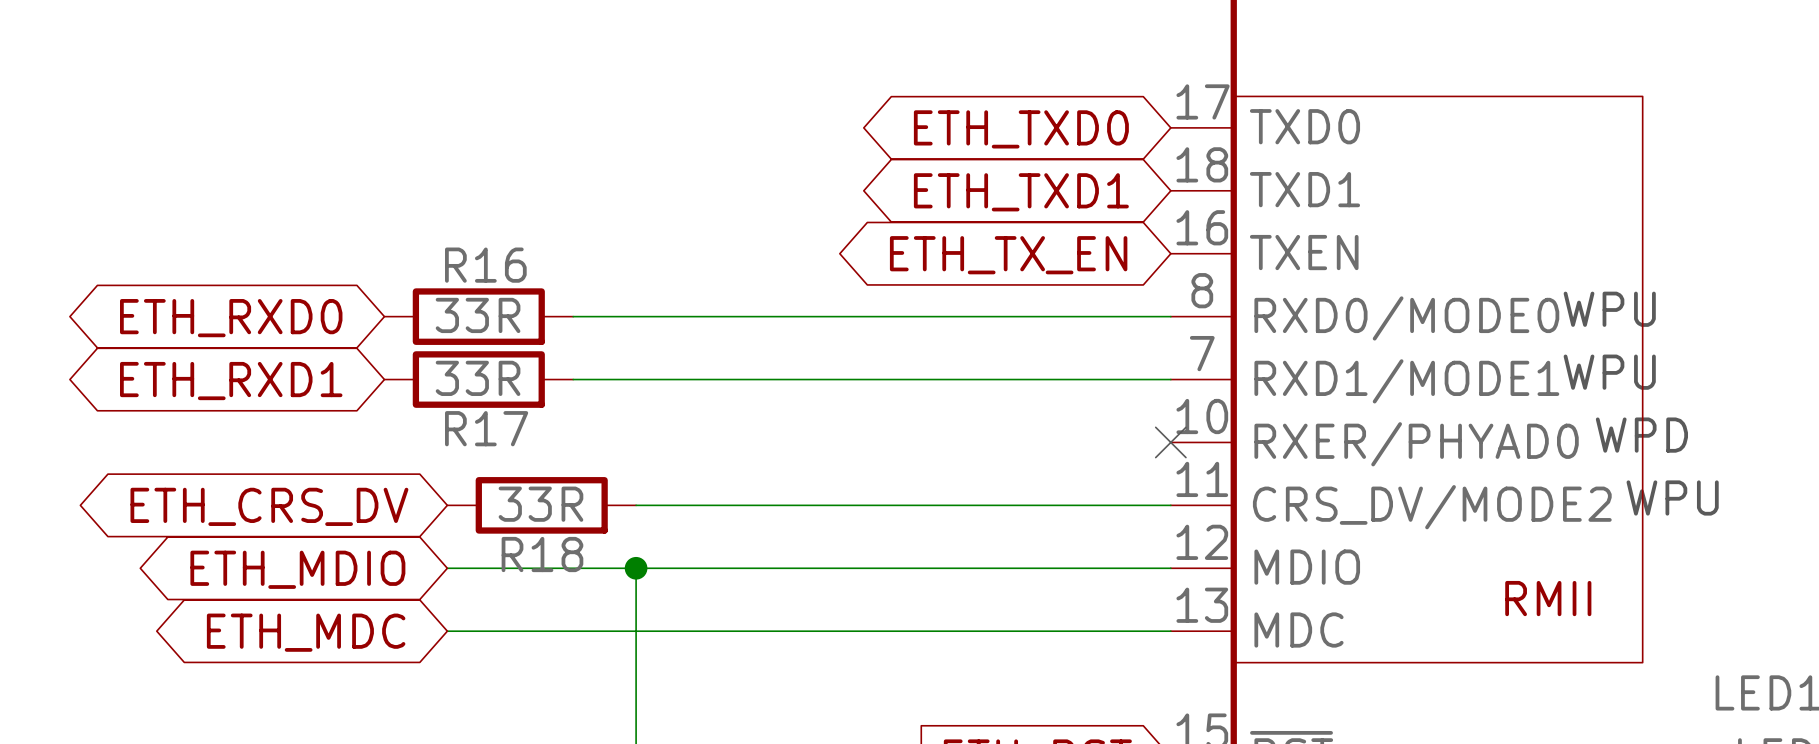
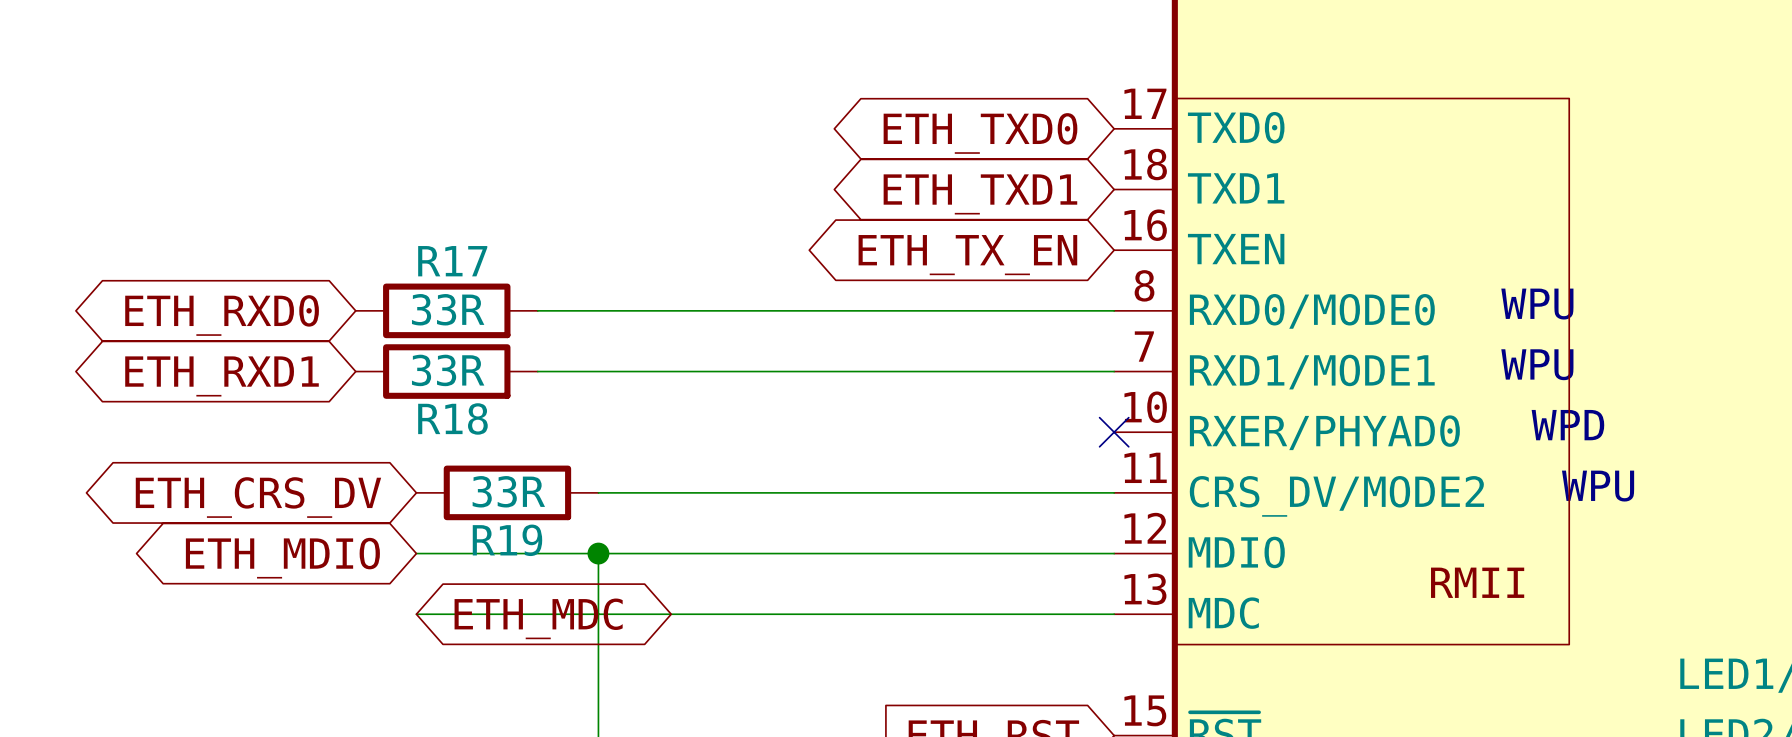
R16 name: R16 (485, 265) -> R17 (452, 261)
R17 name: R17 (486, 428) -> R18 (452, 418)
R18 name: R18 (542, 554) -> R19 (507, 540)
global label rotation: 0° (306, 632) -> 180° (538, 618)

